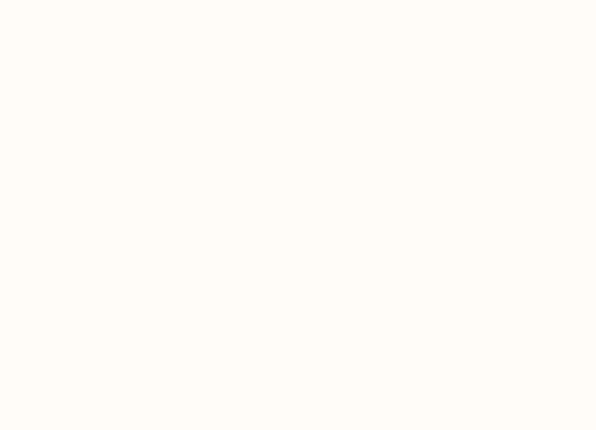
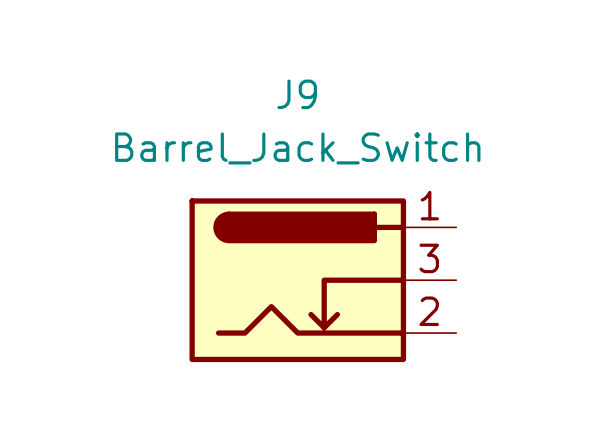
J9: none -> Barrel_Jack_Switch (322, 280)

